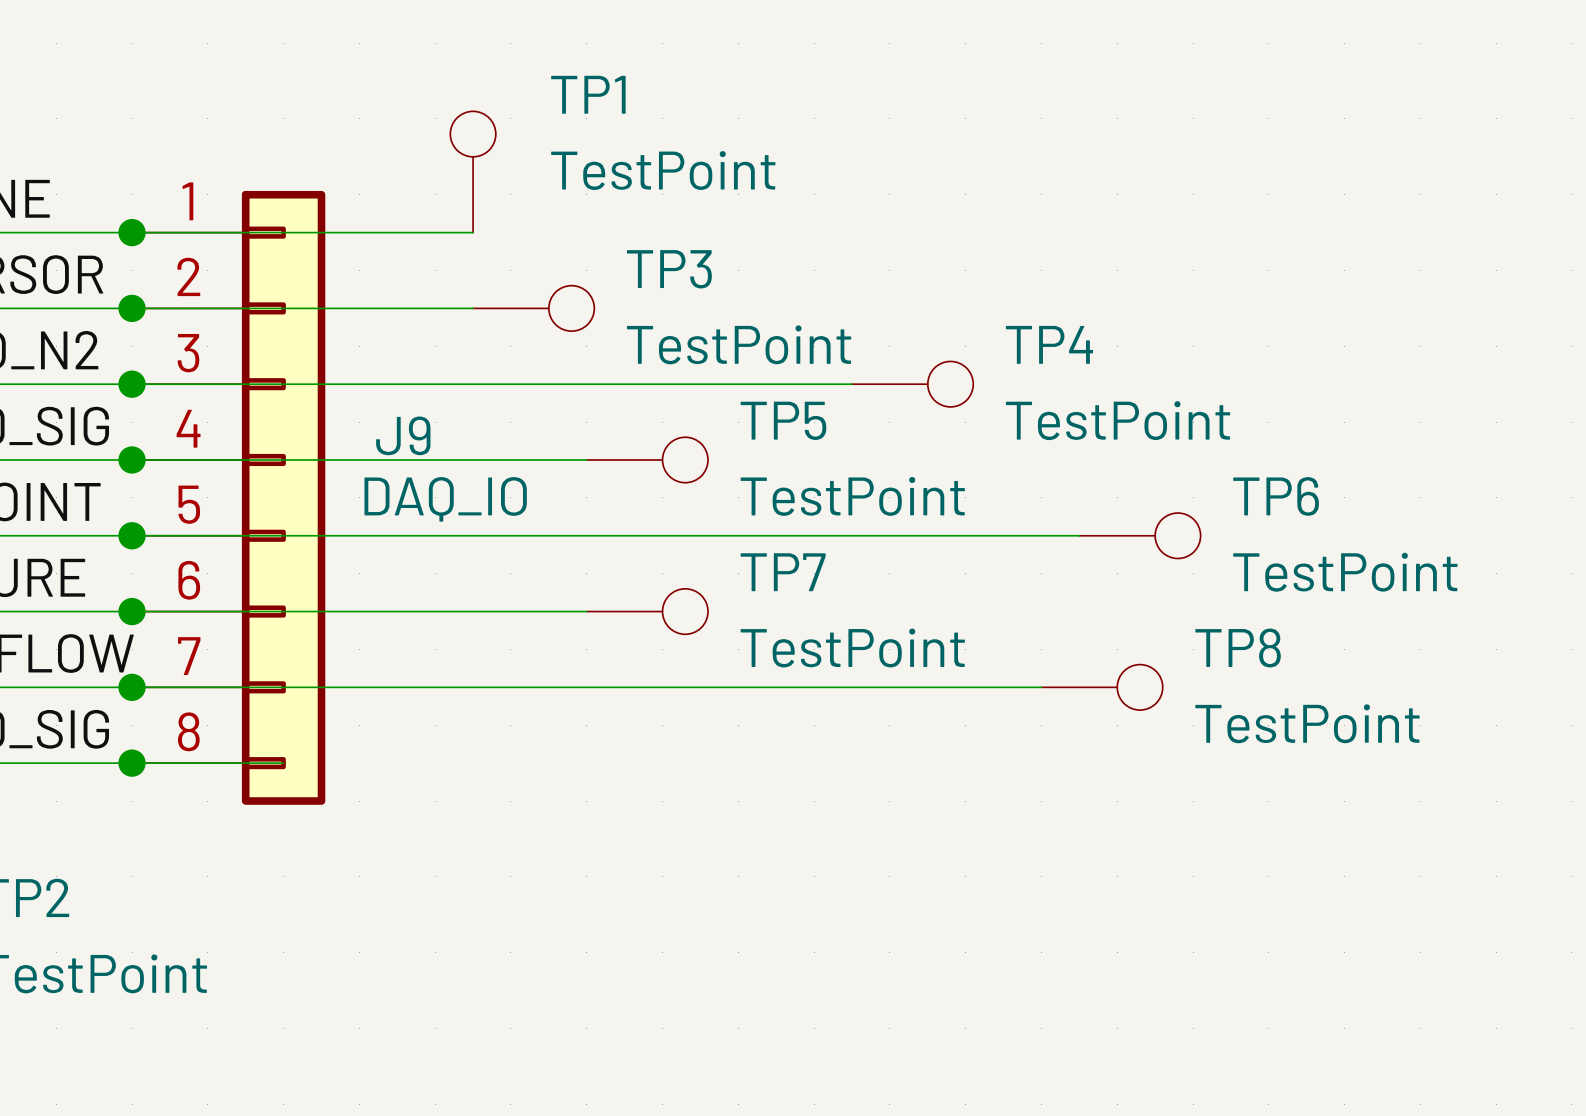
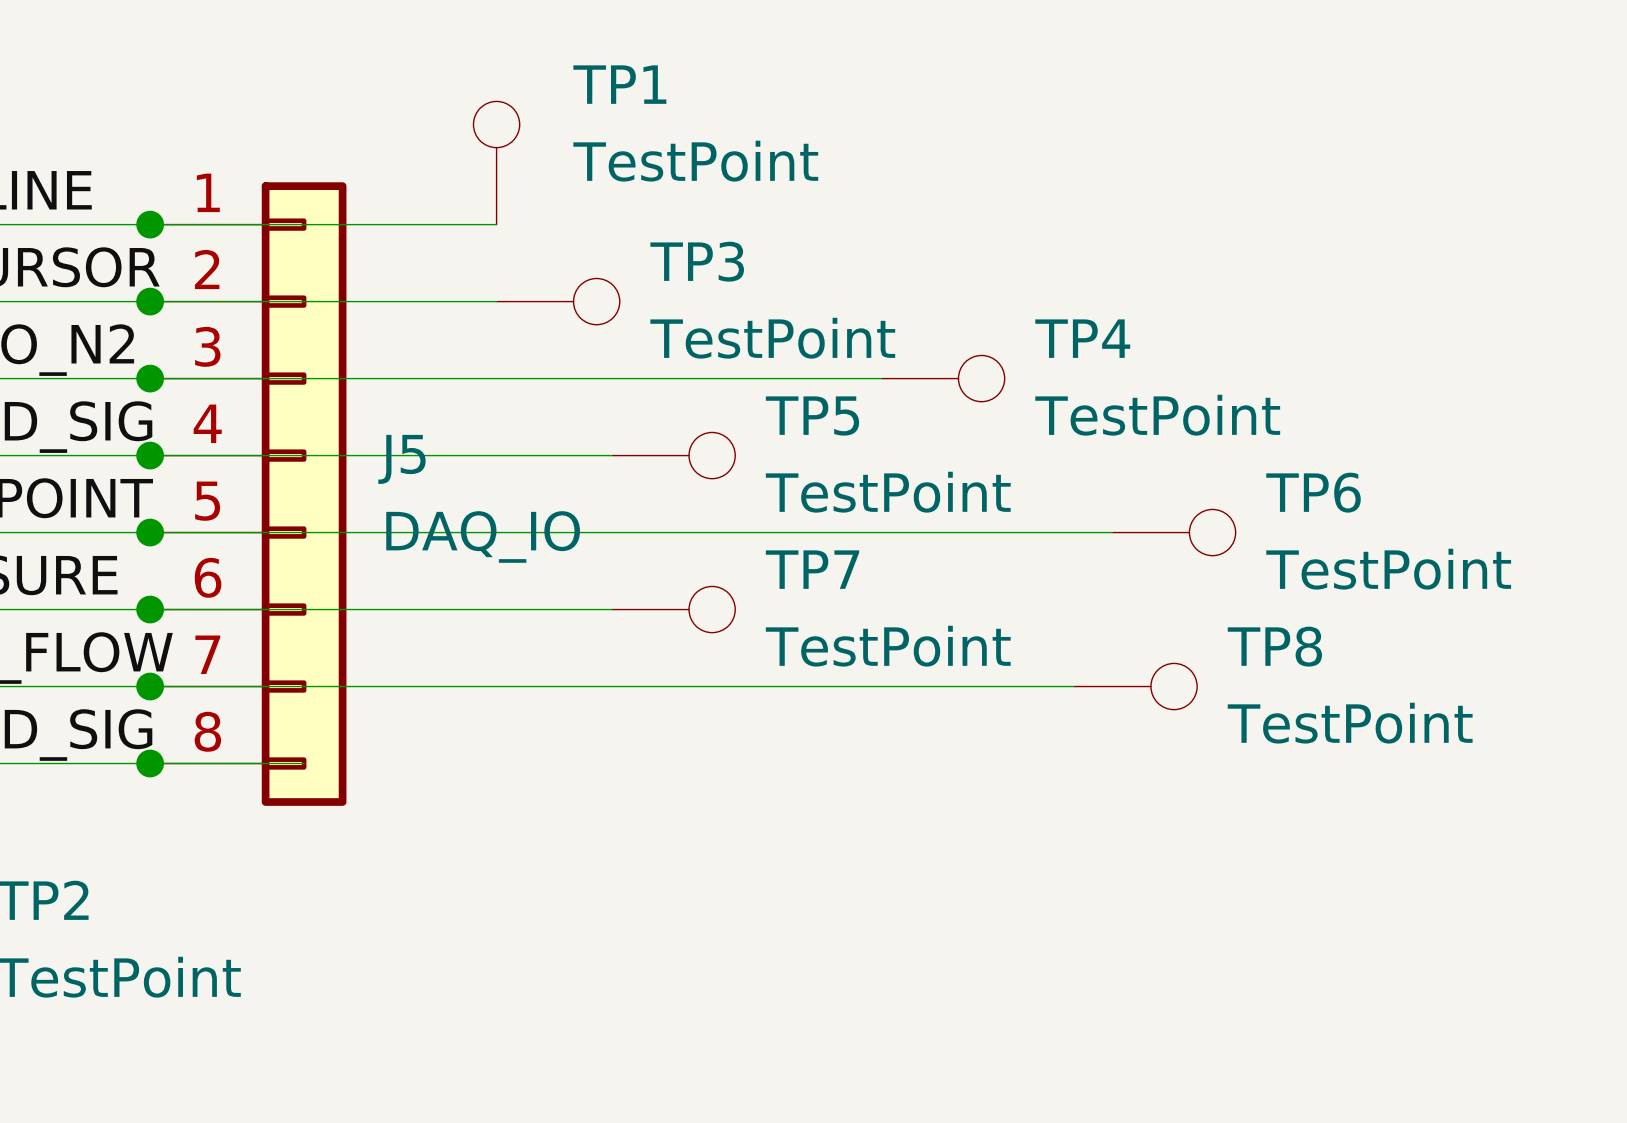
J9 name: J9 (403, 435) -> J5 (402, 459)
J9 value position: DAQ_IO (445, 499) -> DAQ_IO (483, 536)

